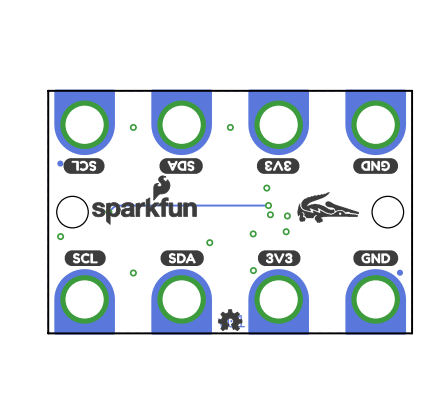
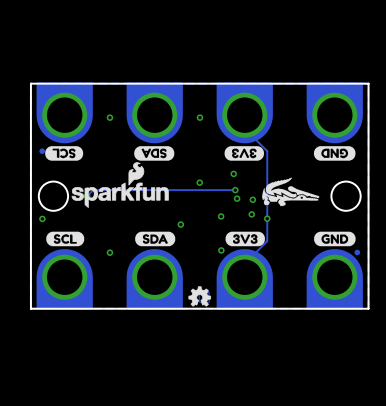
track: none -> (244, 115) (244, 128) (267, 151) (267, 241) (244, 263) (244, 277)
via: none -> (199, 182)
via: none -> (267, 218)

